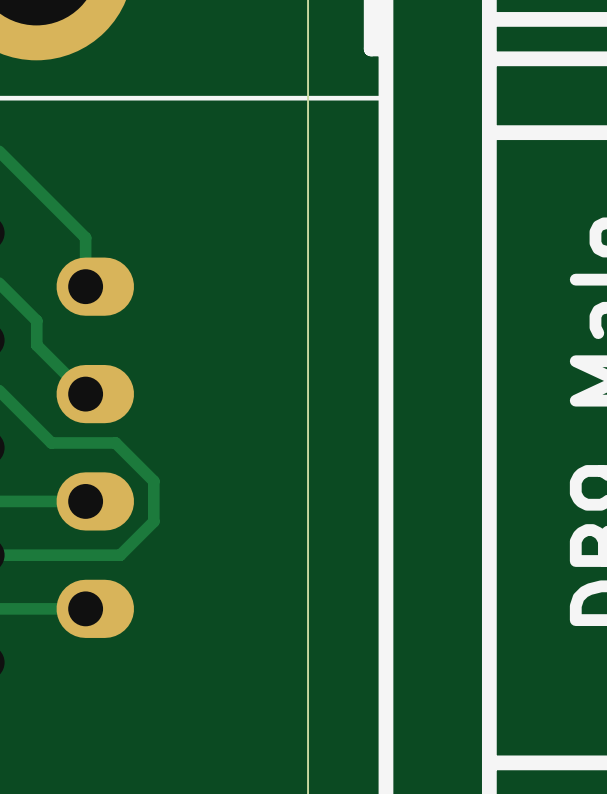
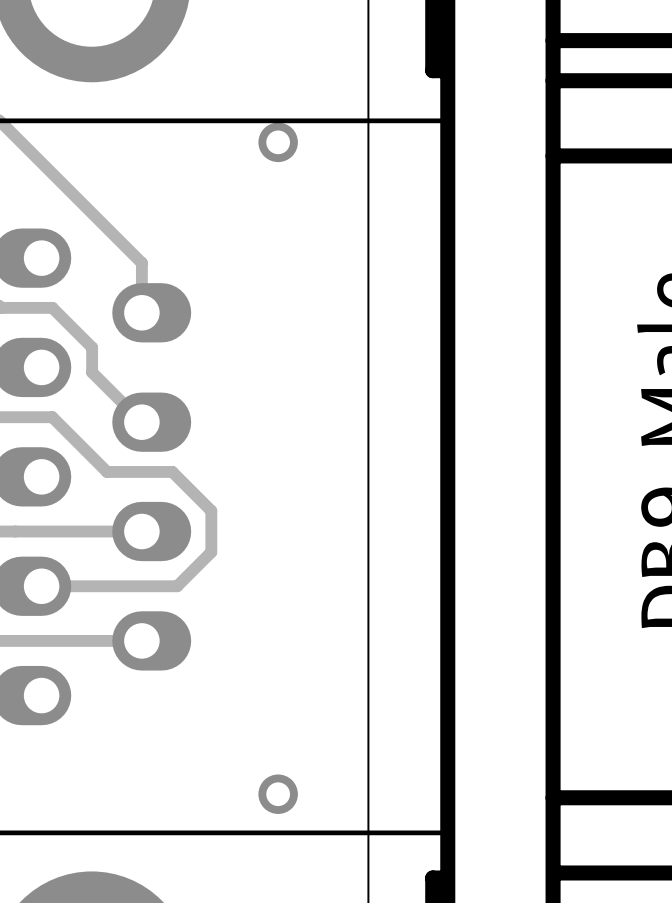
via: none -> (278, 142)
via: none -> (278, 794)

